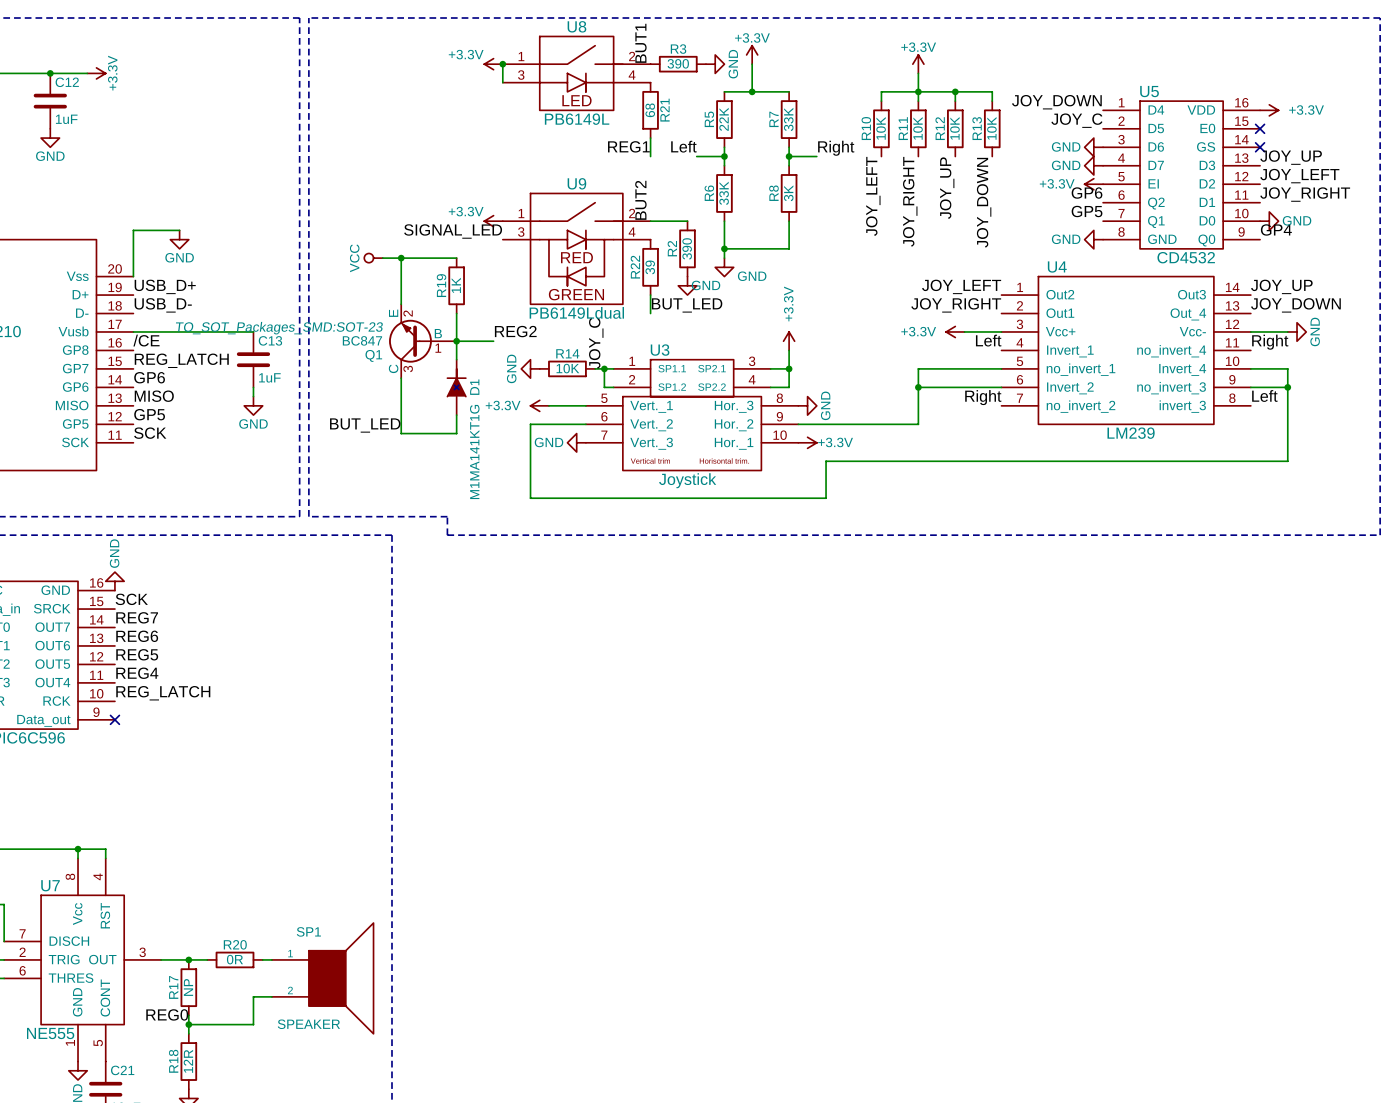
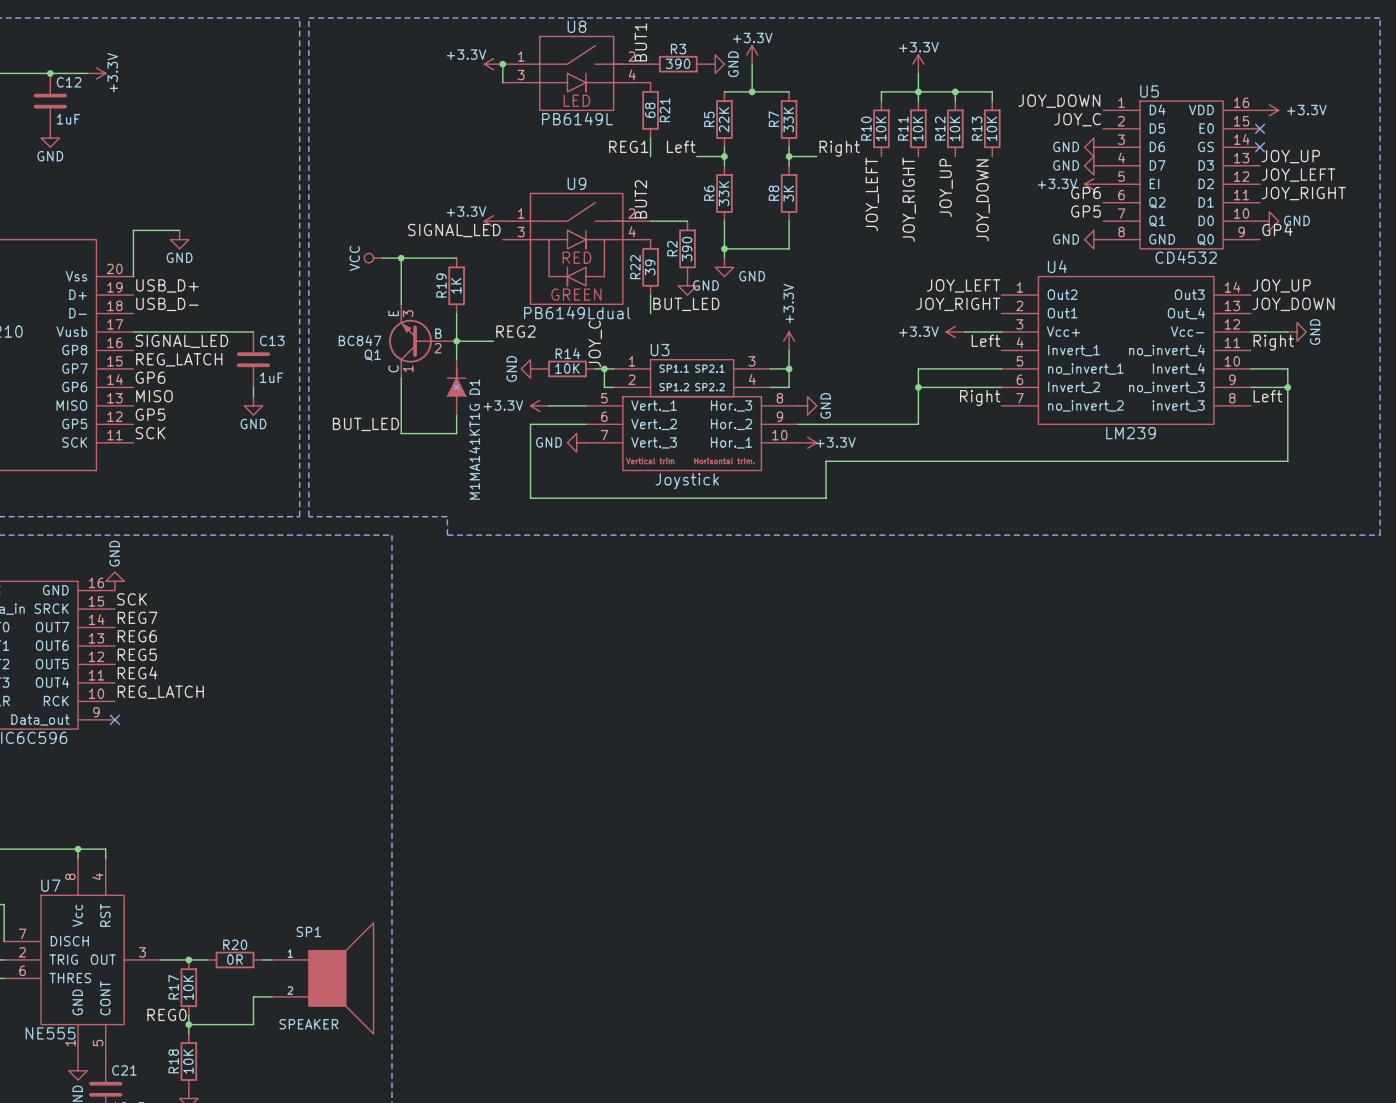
Q1 pin number: 2 (408, 313) -> 3 (408, 313)
Q1 text: TO_SOT_Packages_SMD:SOT-23 (279, 328) -> none
label: /CE (146, 340) -> SIGNAL_LED (181, 341)
Q1 pin number: 1 (438, 348) -> 2 (437, 348)
Q1 pin number: 3 (408, 368) -> 1 (408, 368)
R17 value: NP (188, 987) -> 10K (188, 987)
R18 value: 12R (188, 1061) -> 10K (188, 1061)

